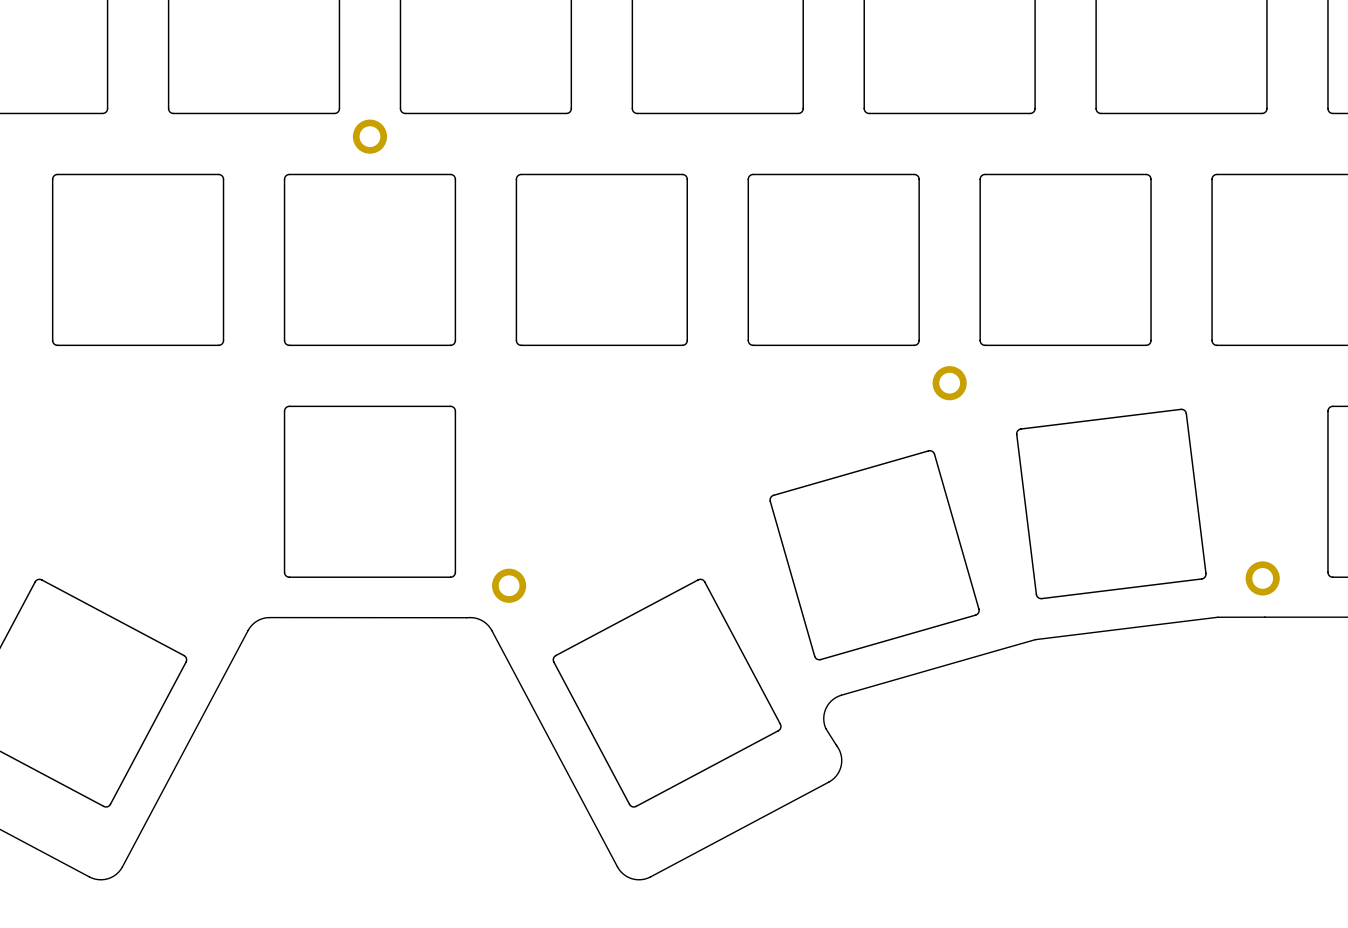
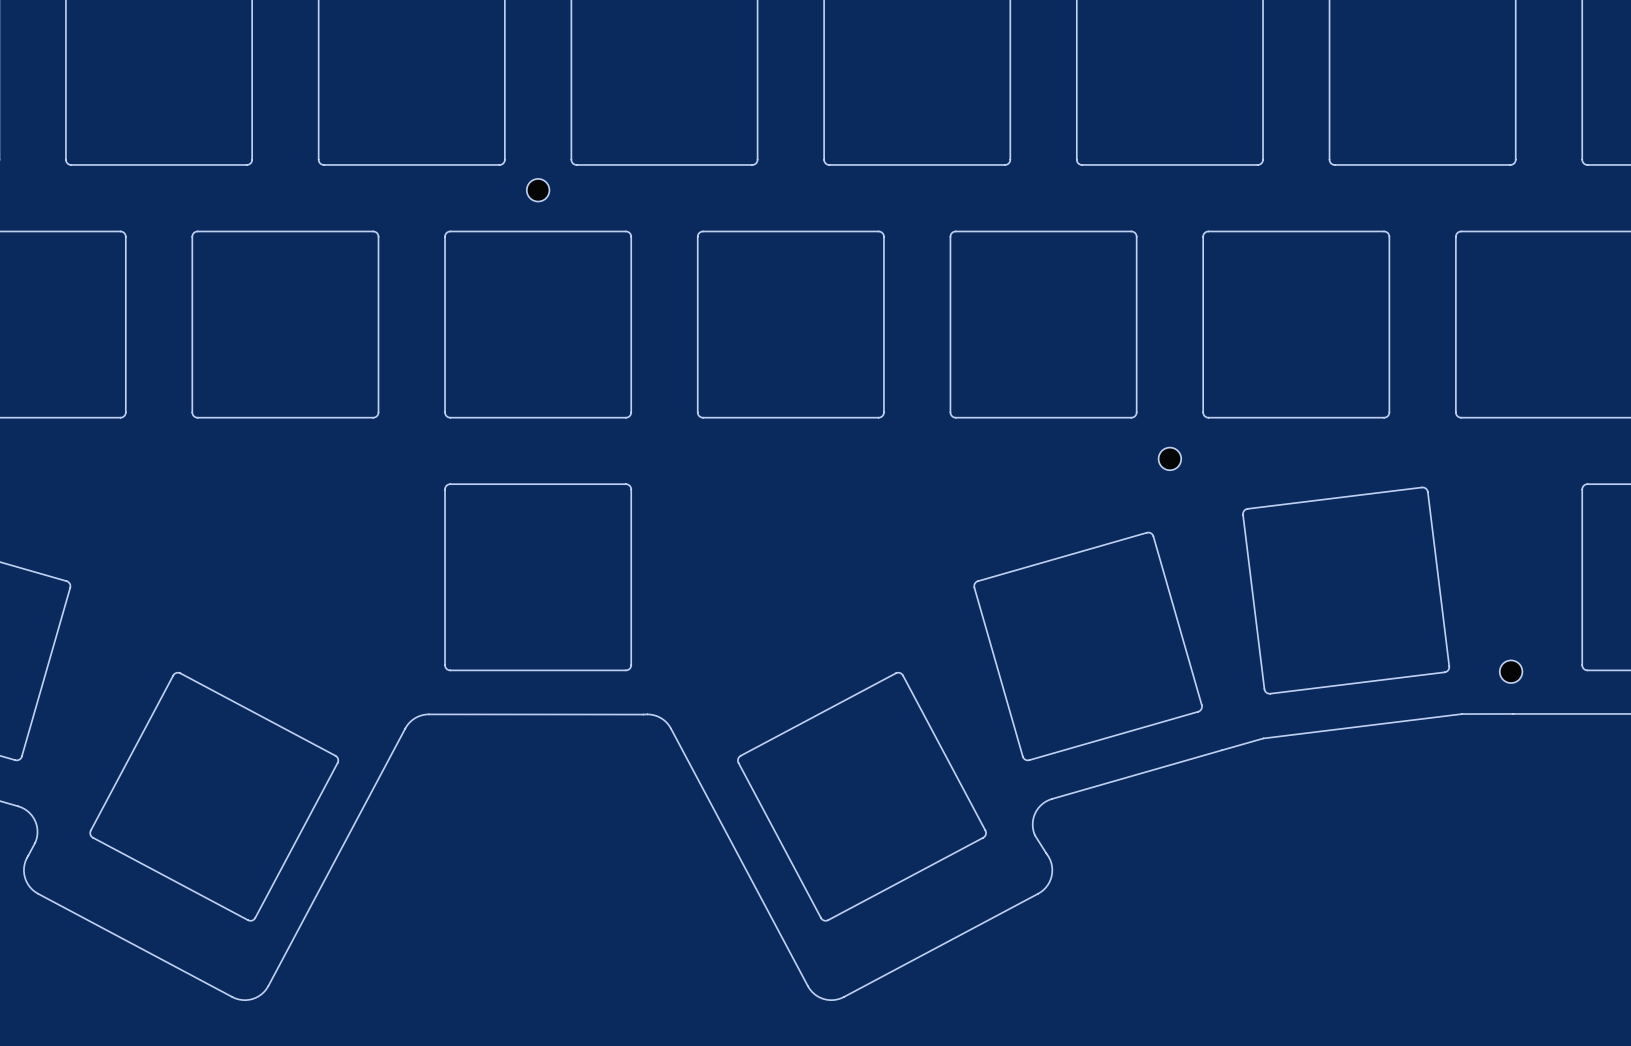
part footprint: [352, 119, 388, 154] -> [526, 178, 550, 202]
part footprint: [932, 366, 967, 401] -> [1158, 447, 1182, 471]
part footprint: [1245, 561, 1280, 596] -> [1499, 660, 1523, 684]
part: (509, 585) -> none

